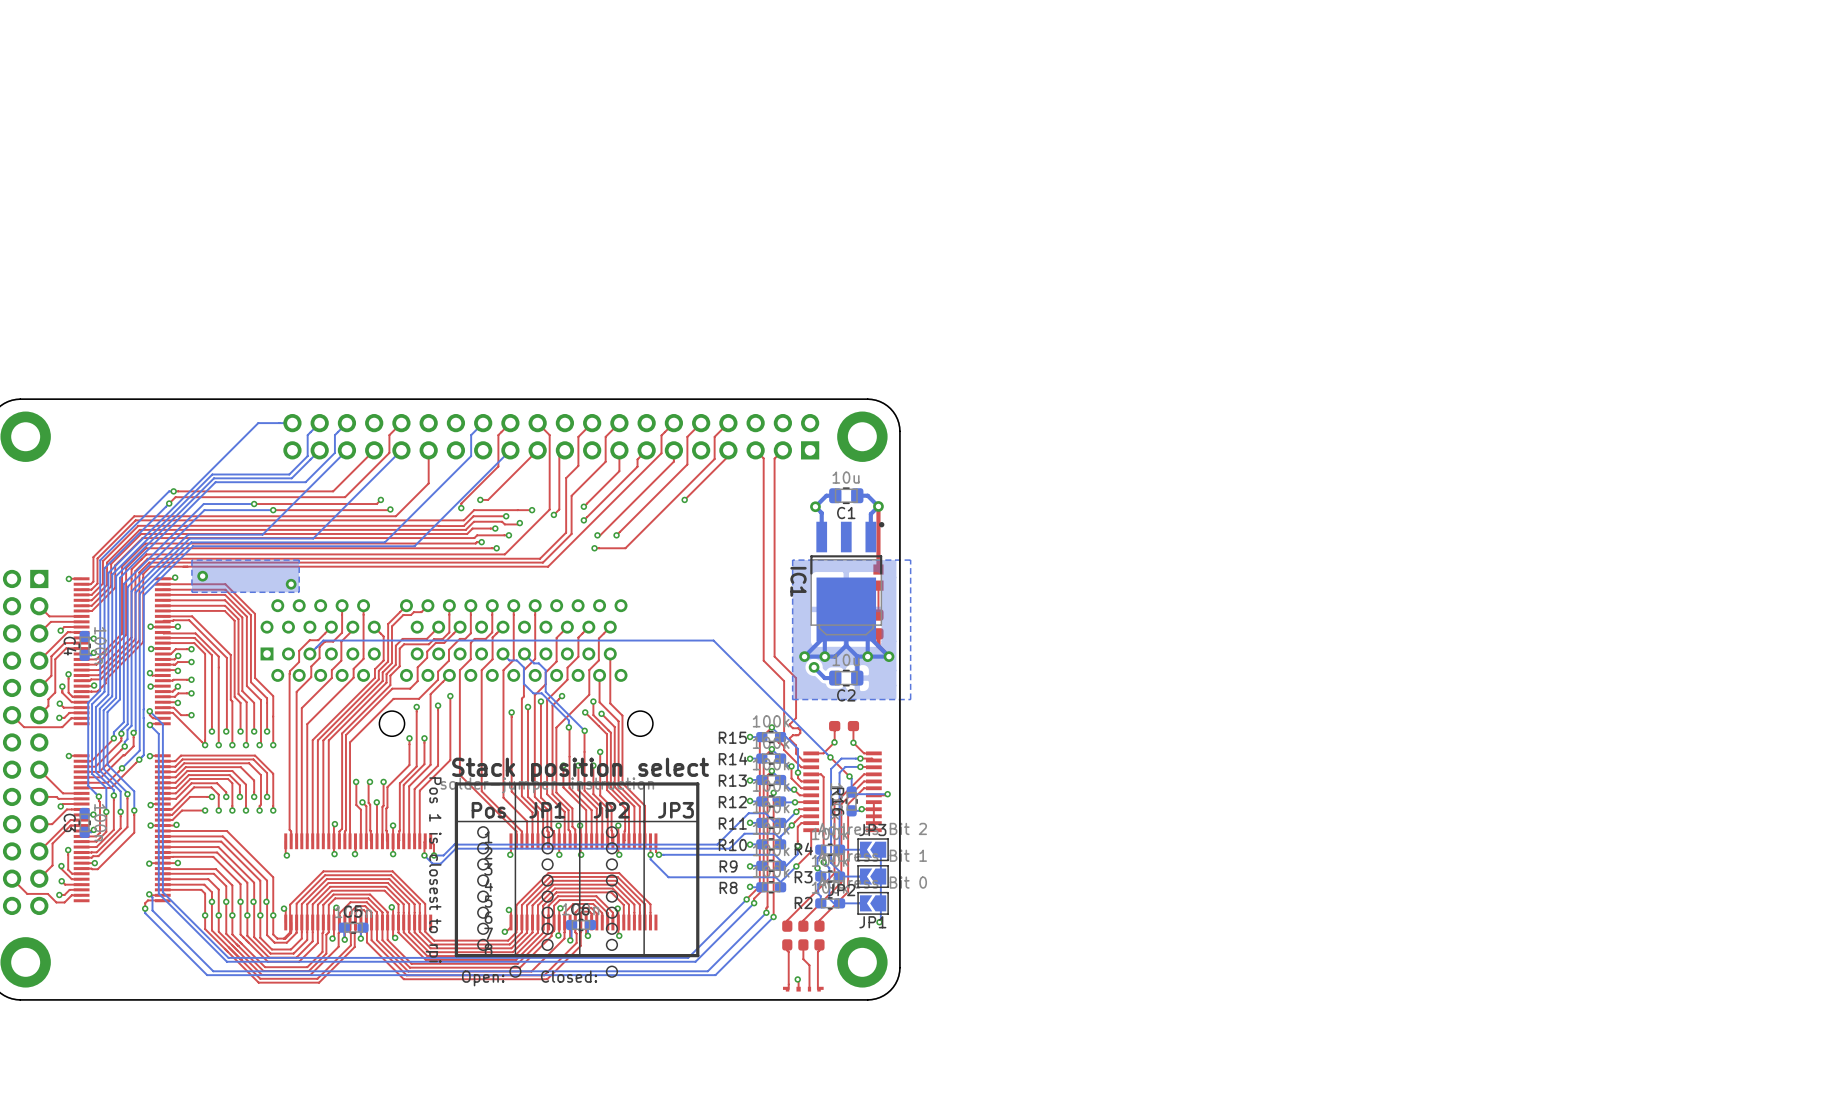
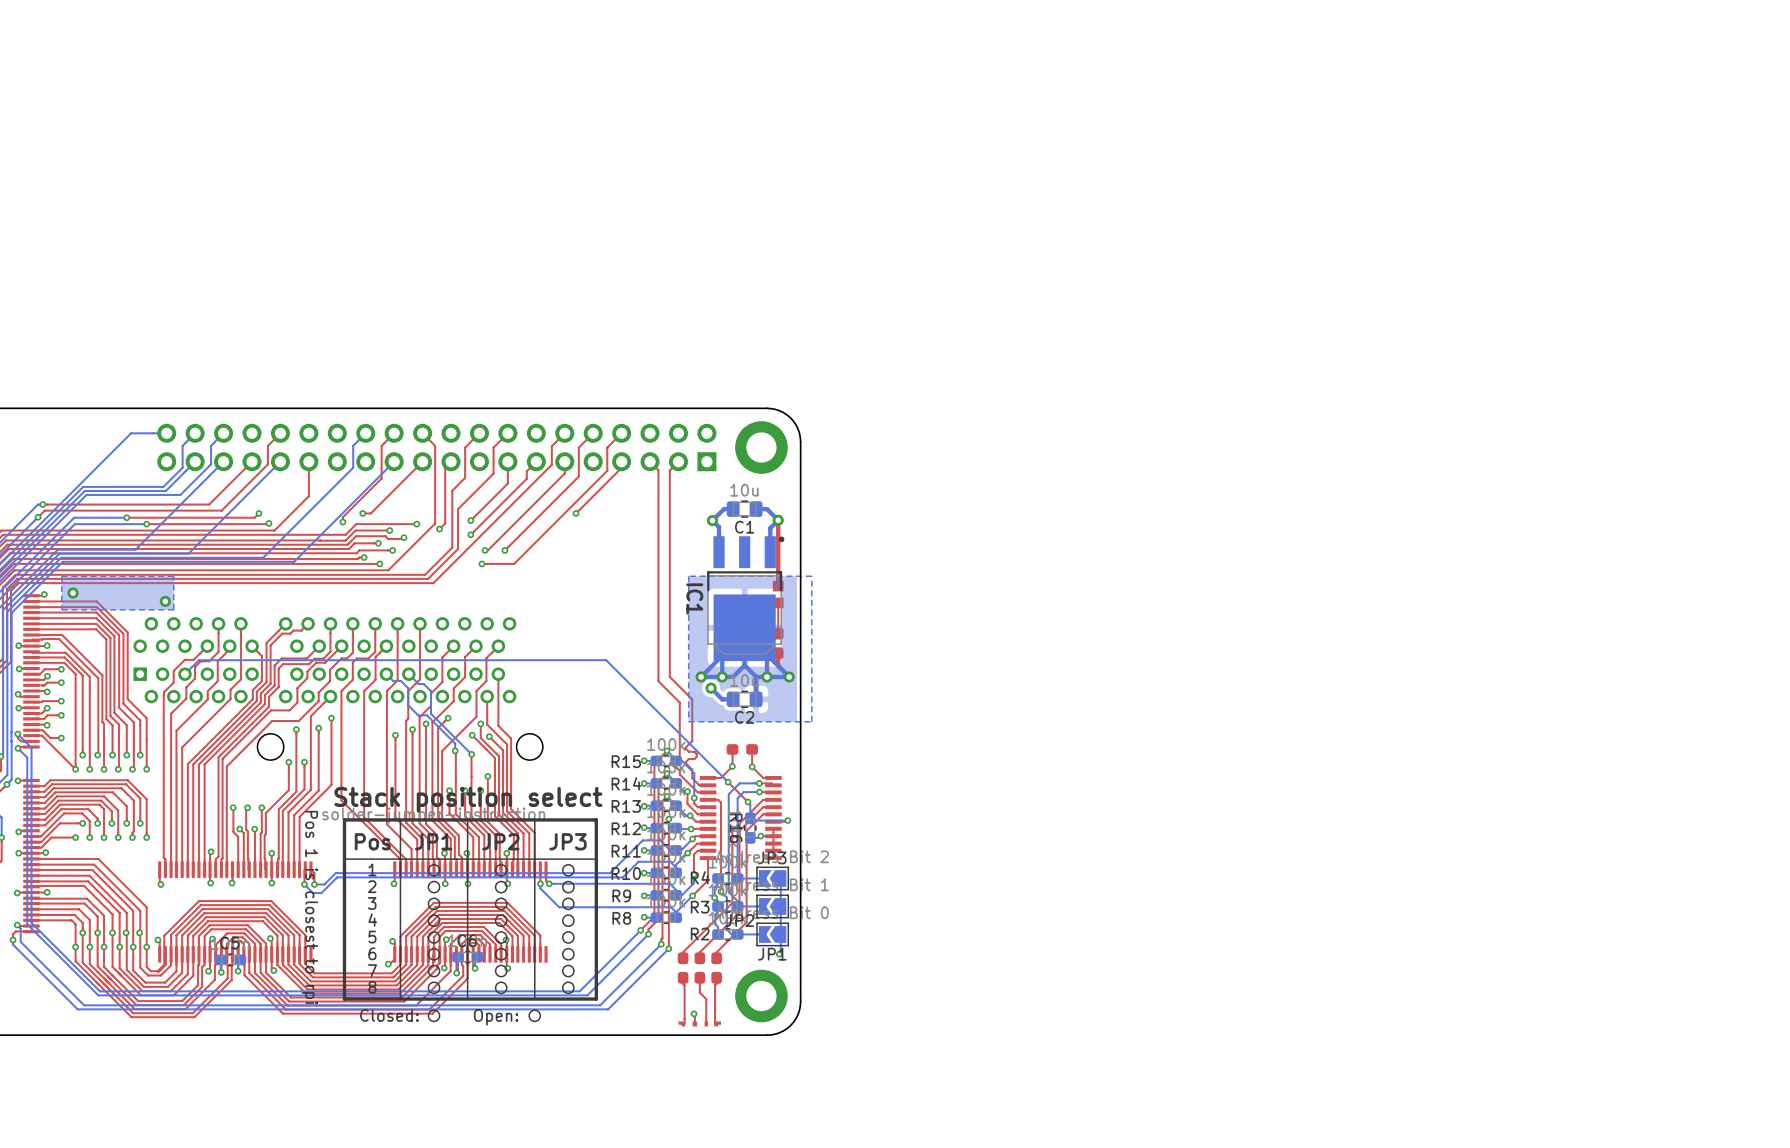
drawing: [454, 782, 700, 978] -> none
drawing: none -> [342, 818, 599, 1023]

